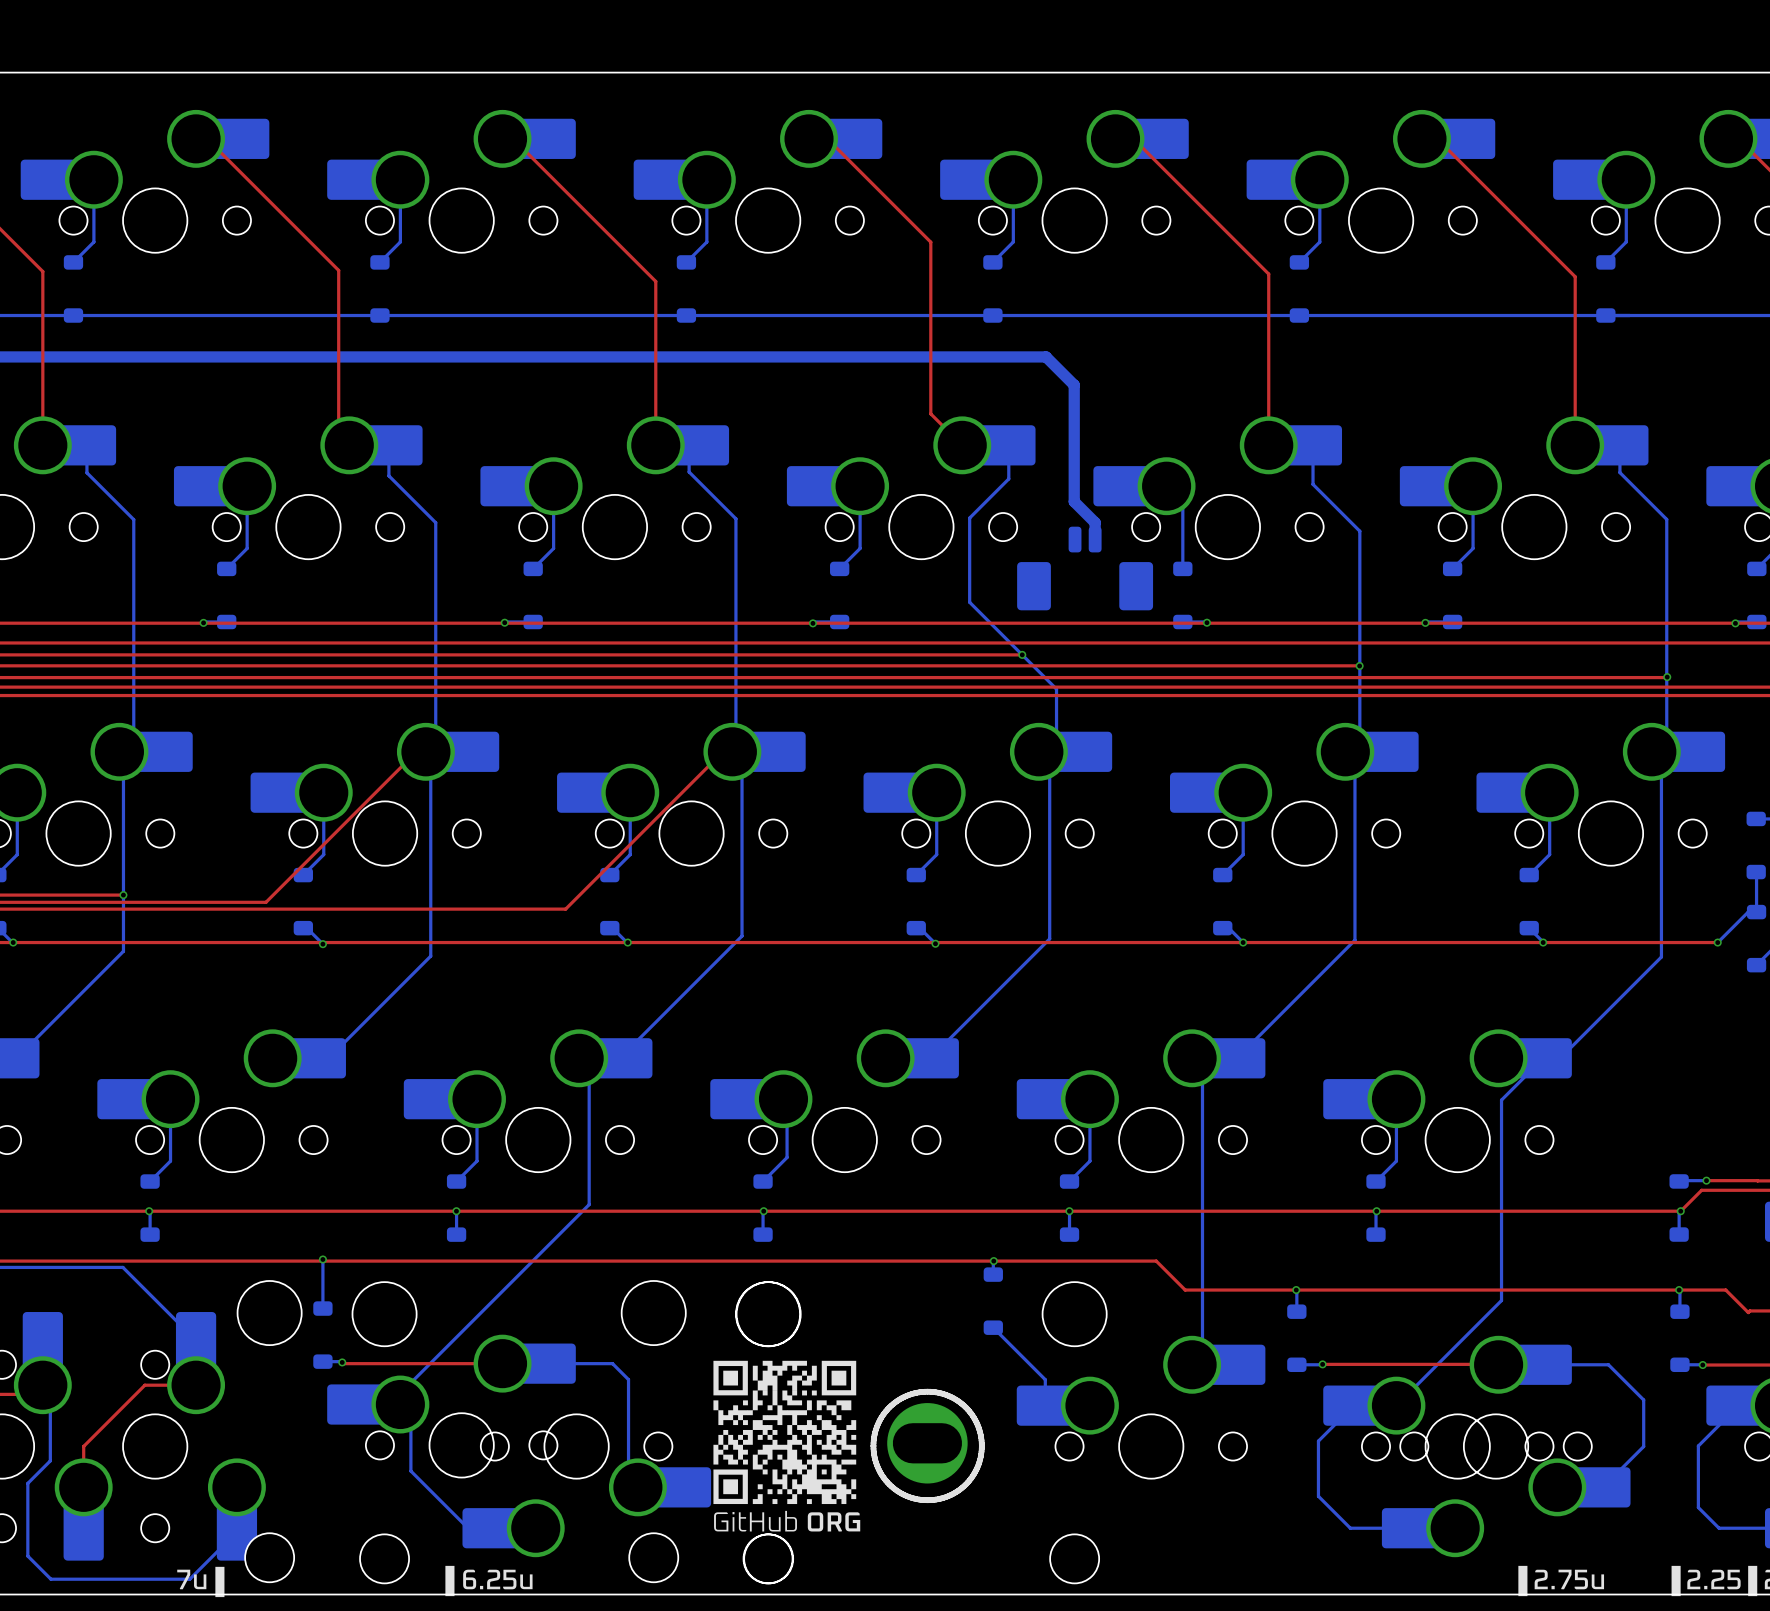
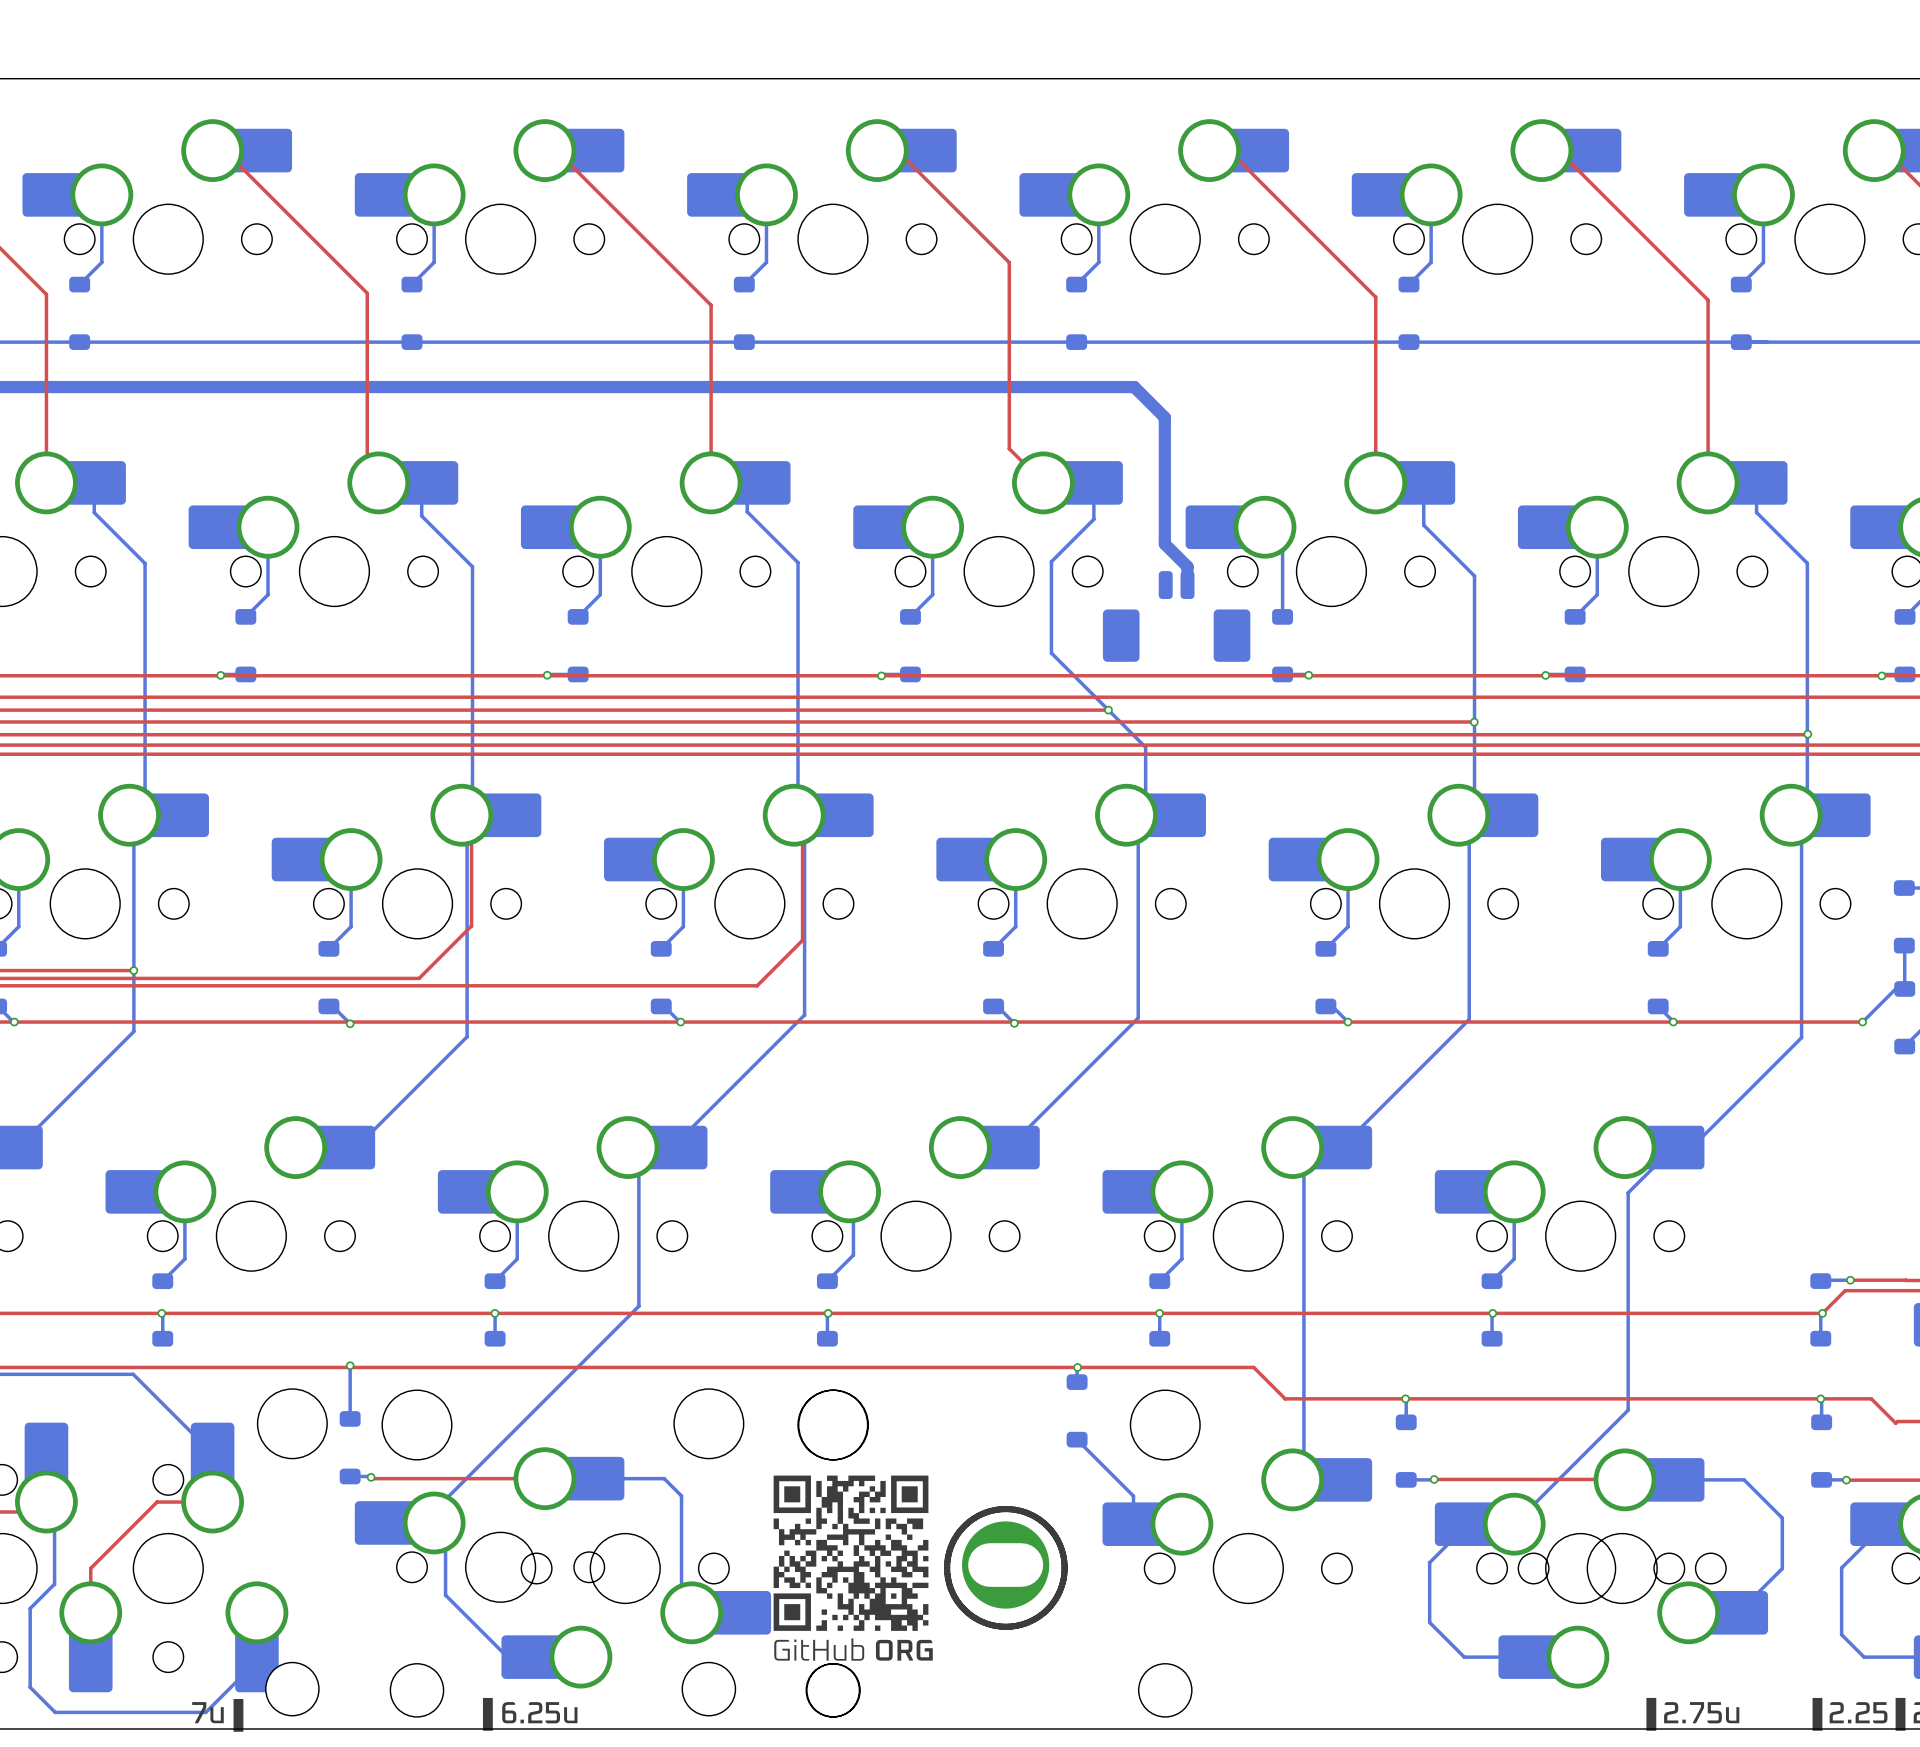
top track: (416, 751) (265, 902) -> (461, 815) (471, 824) (471, 926) (419, 978) (288, 978)
top track: (722, 751) (565, 909) -> (794, 815) (802, 823) (802, 940) (757, 985) (613, 985)

